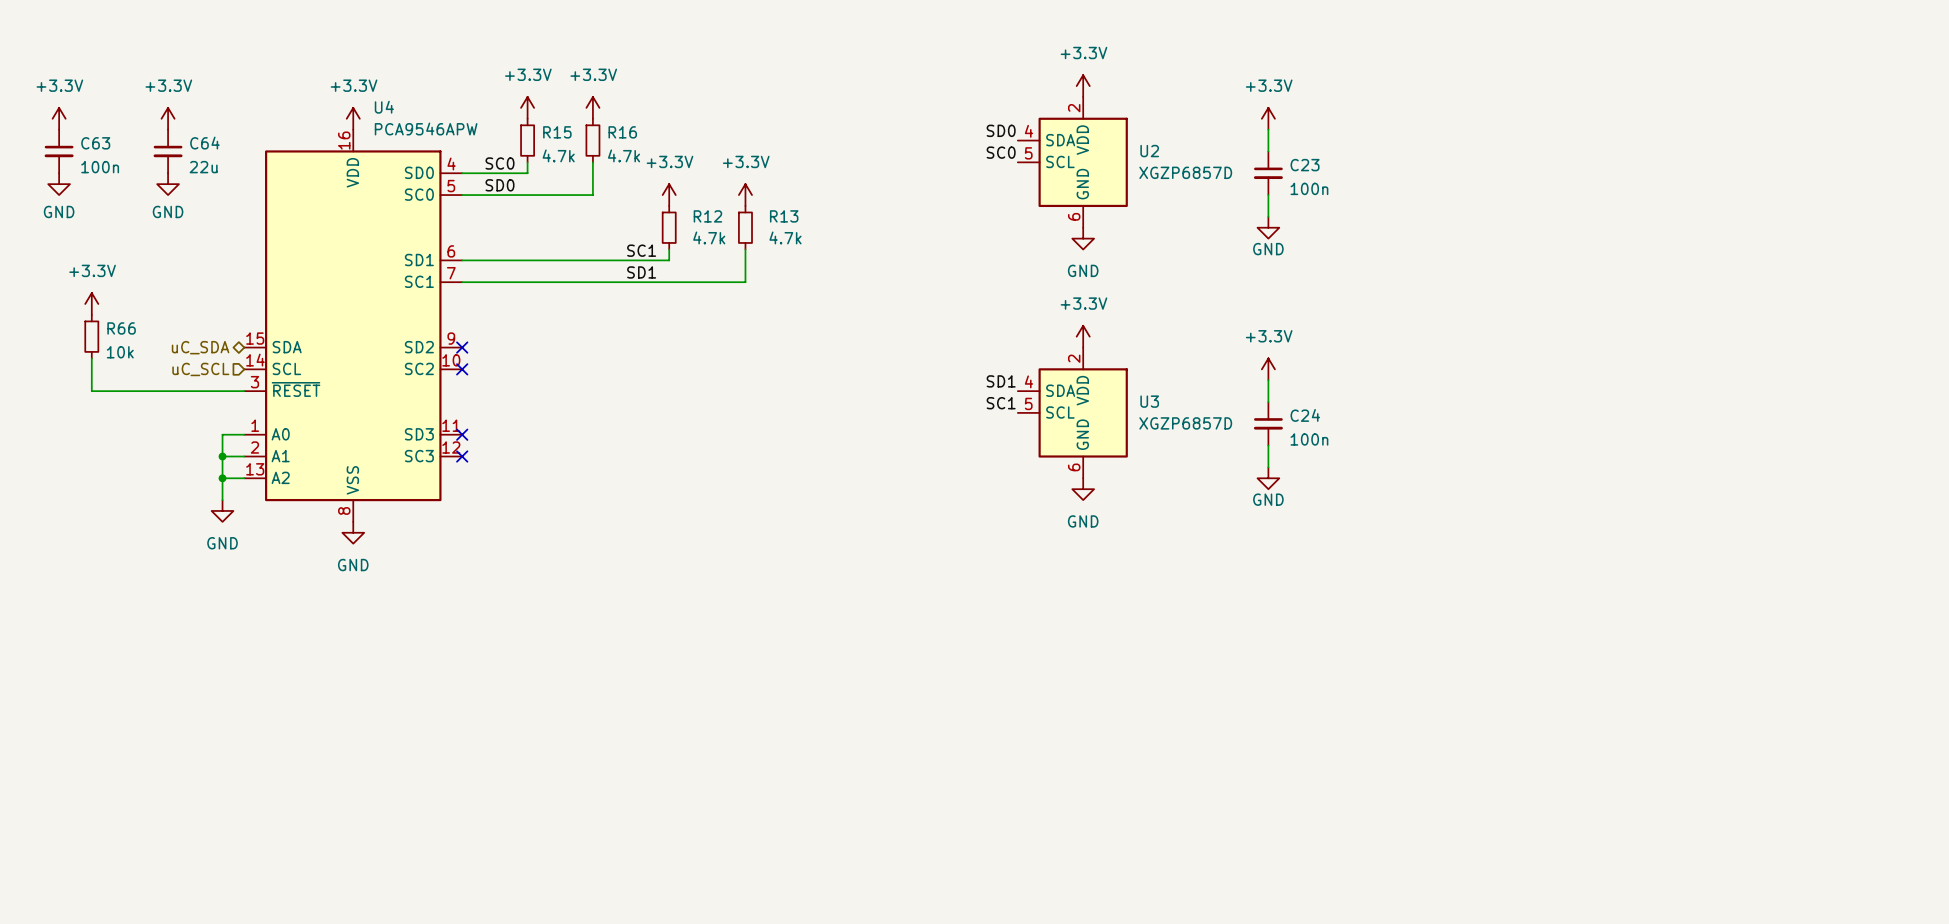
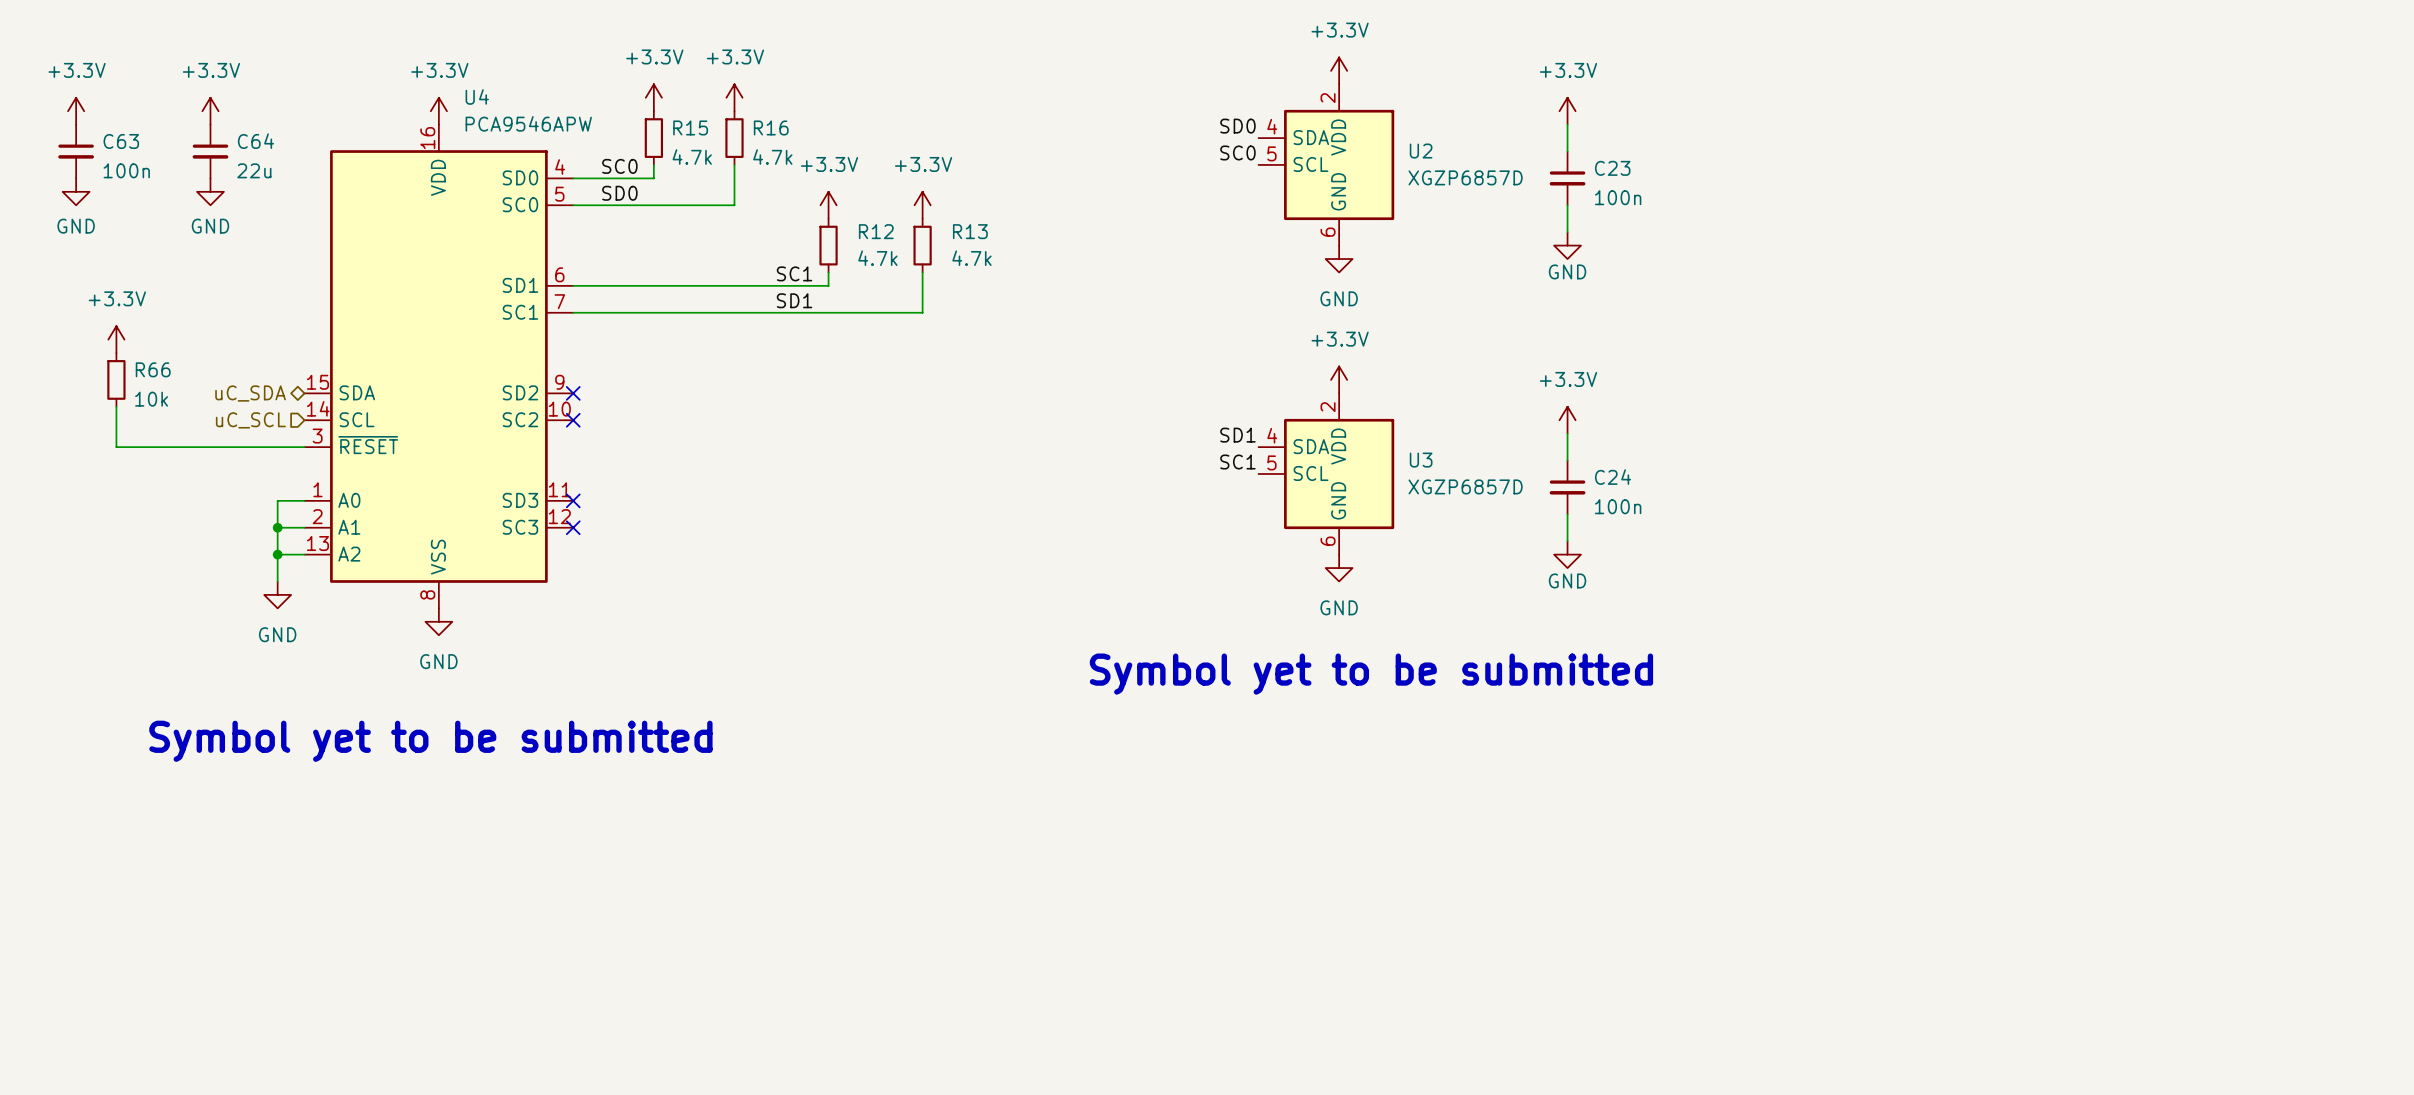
text: none -> Symbol yet to be submitted (1371, 674)
text: none -> Symbol yet to be submitted (430, 741)

